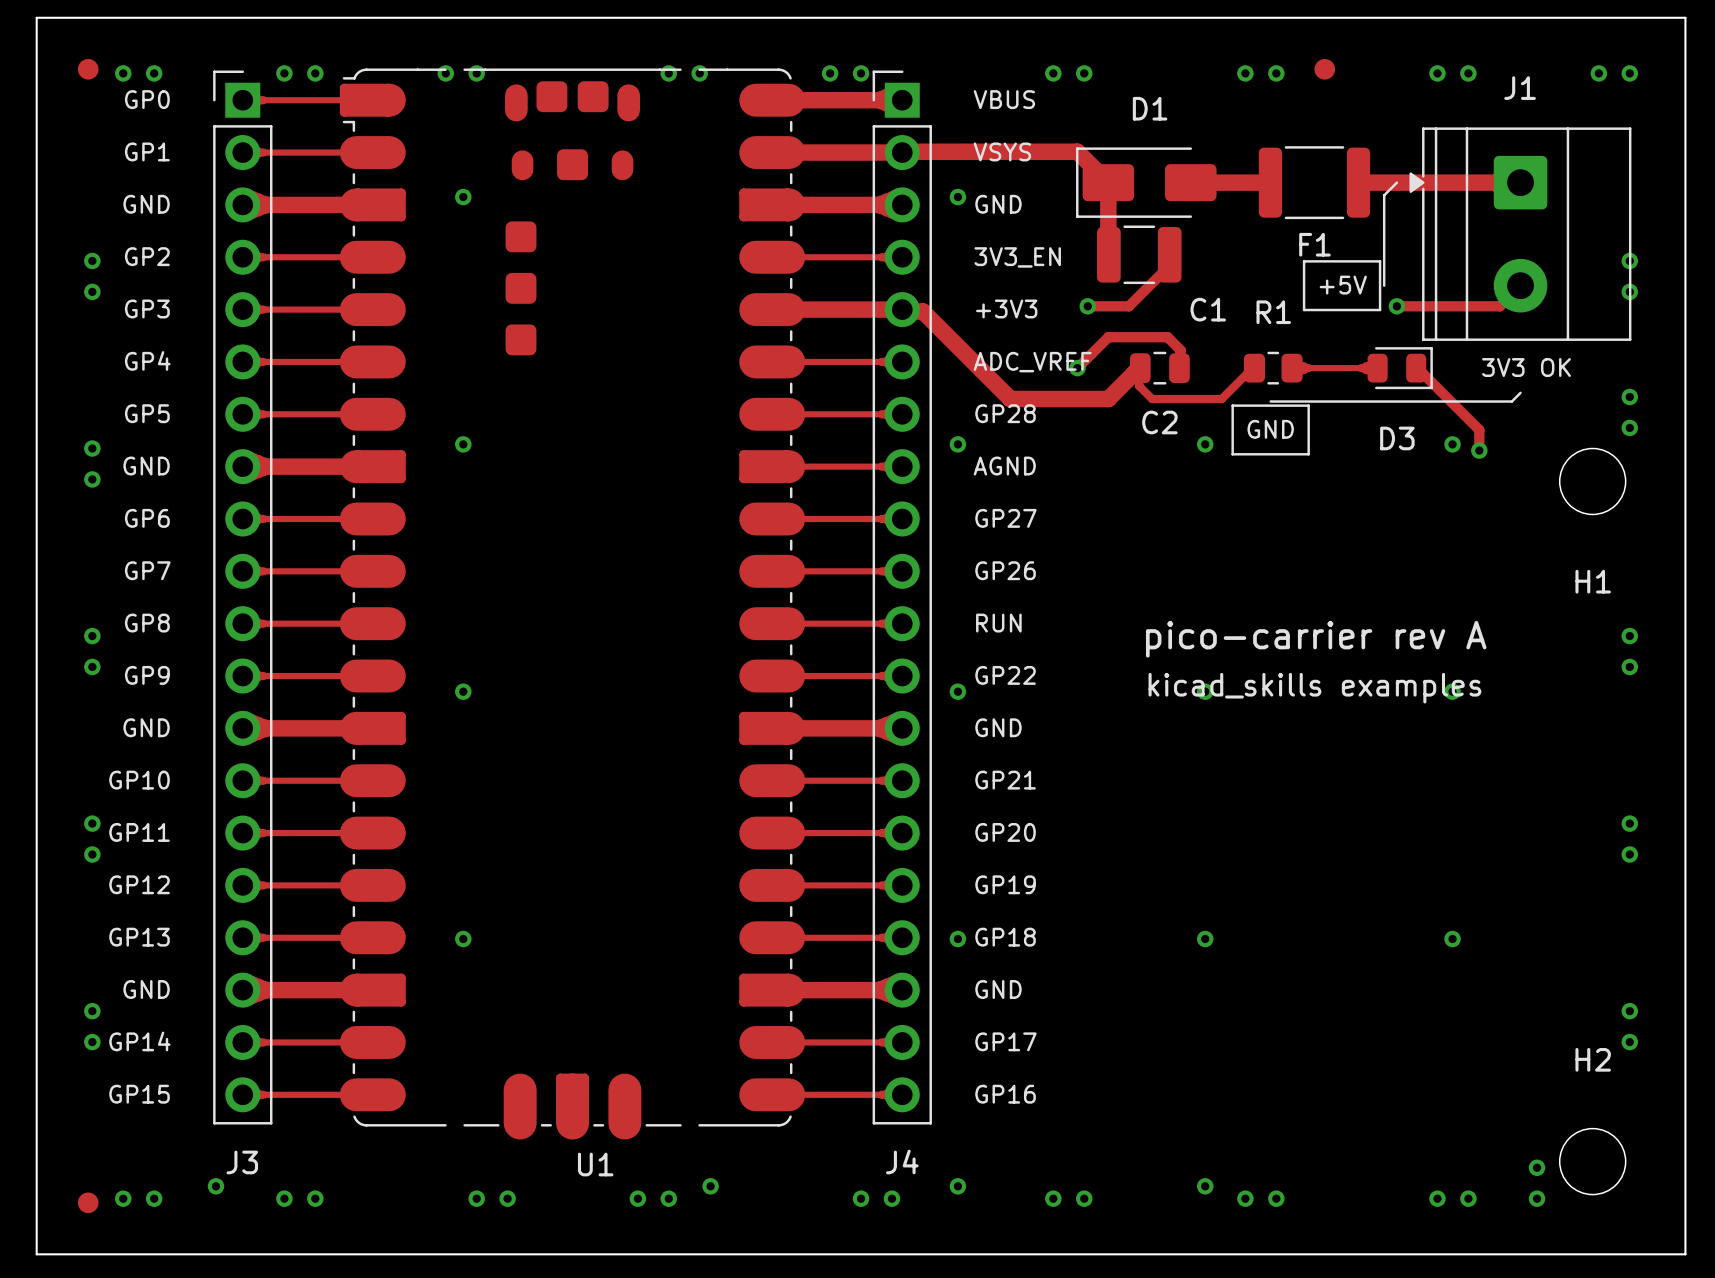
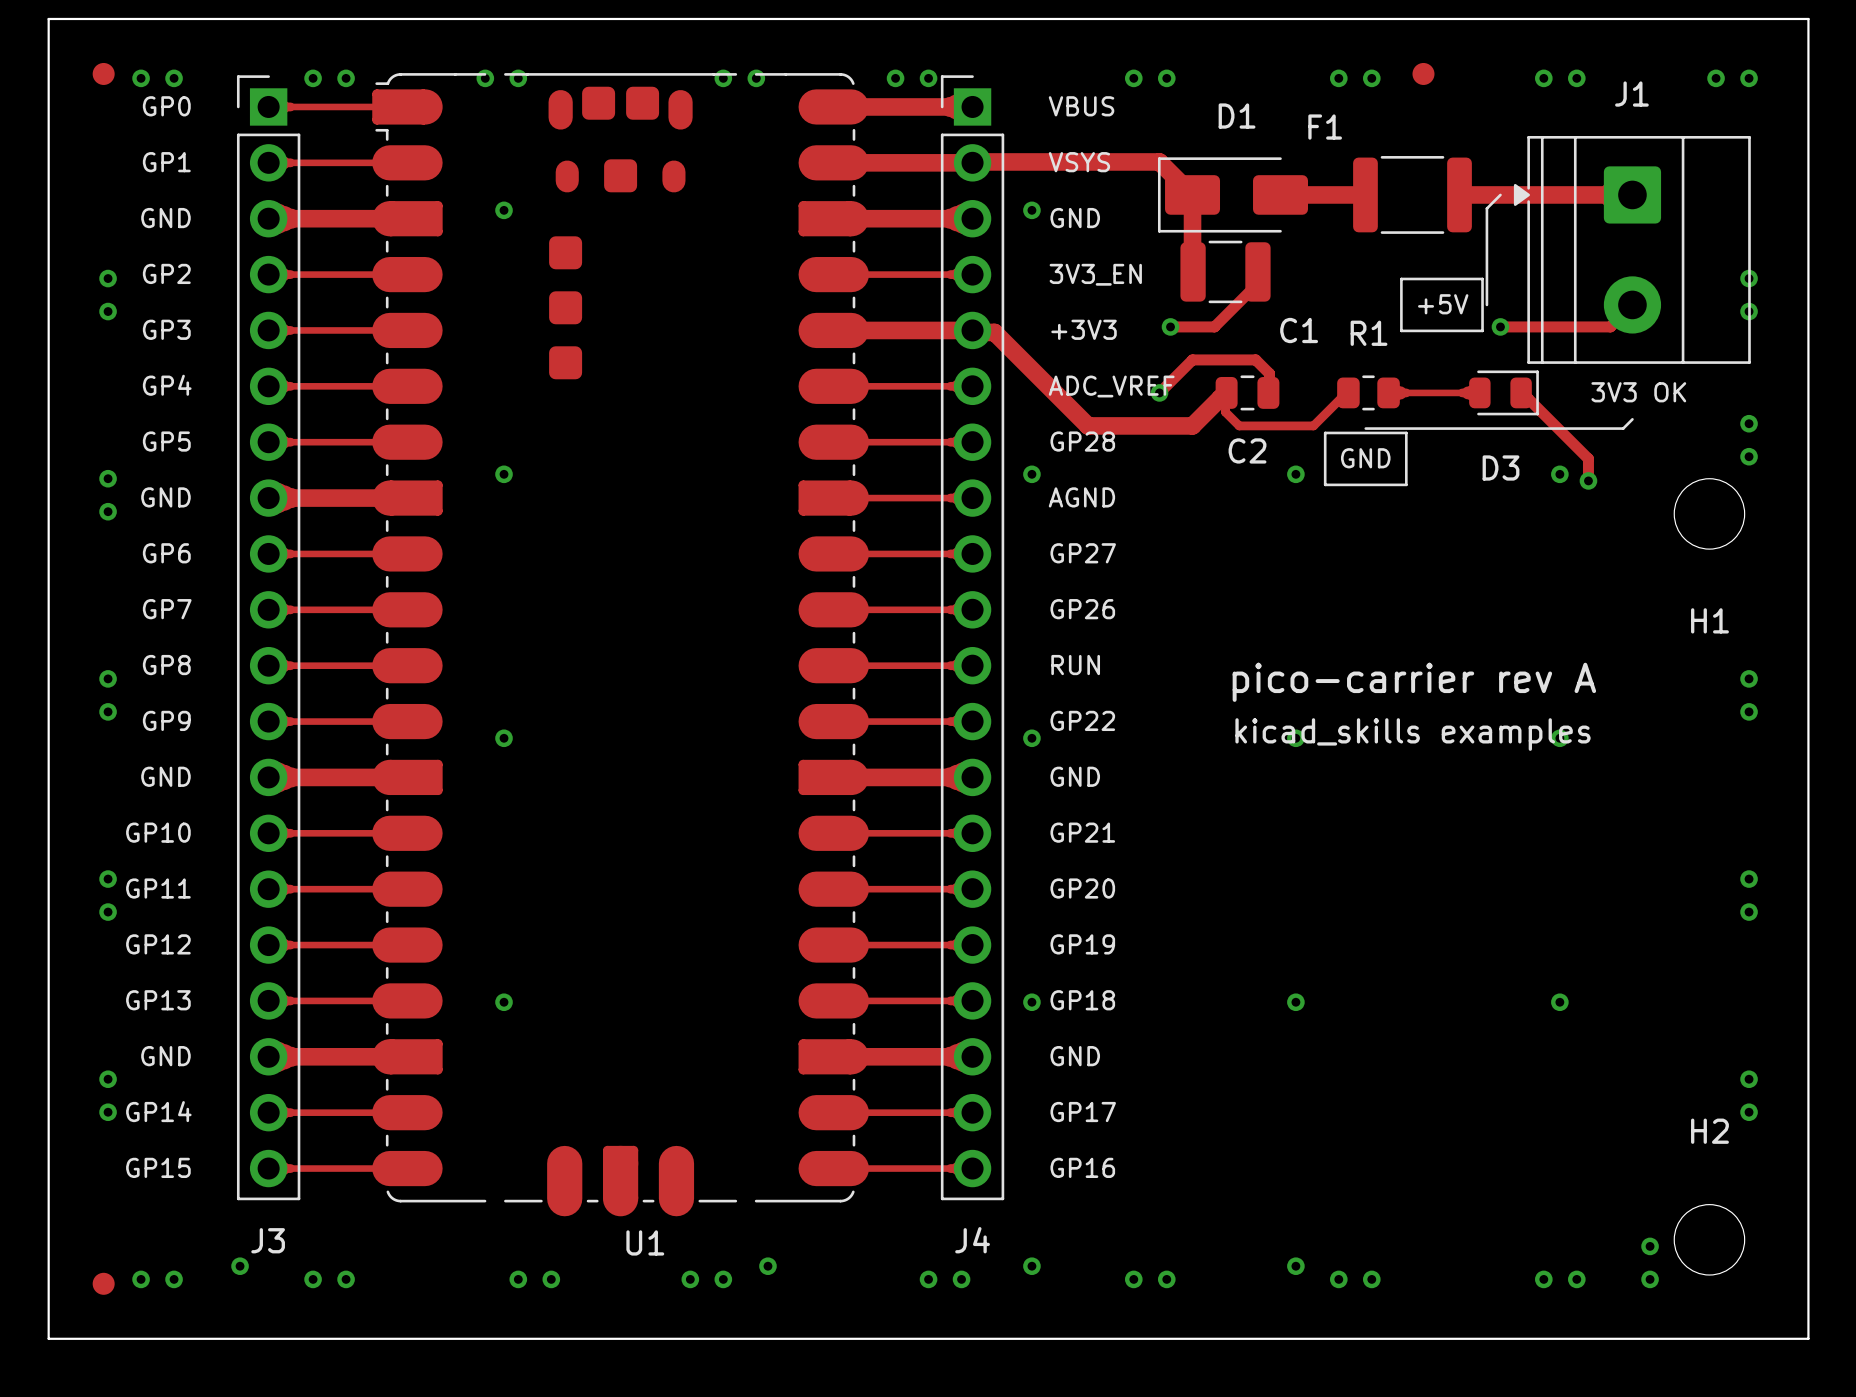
F1 name position: F1 (1314, 244) -> F1 (1325, 127)

